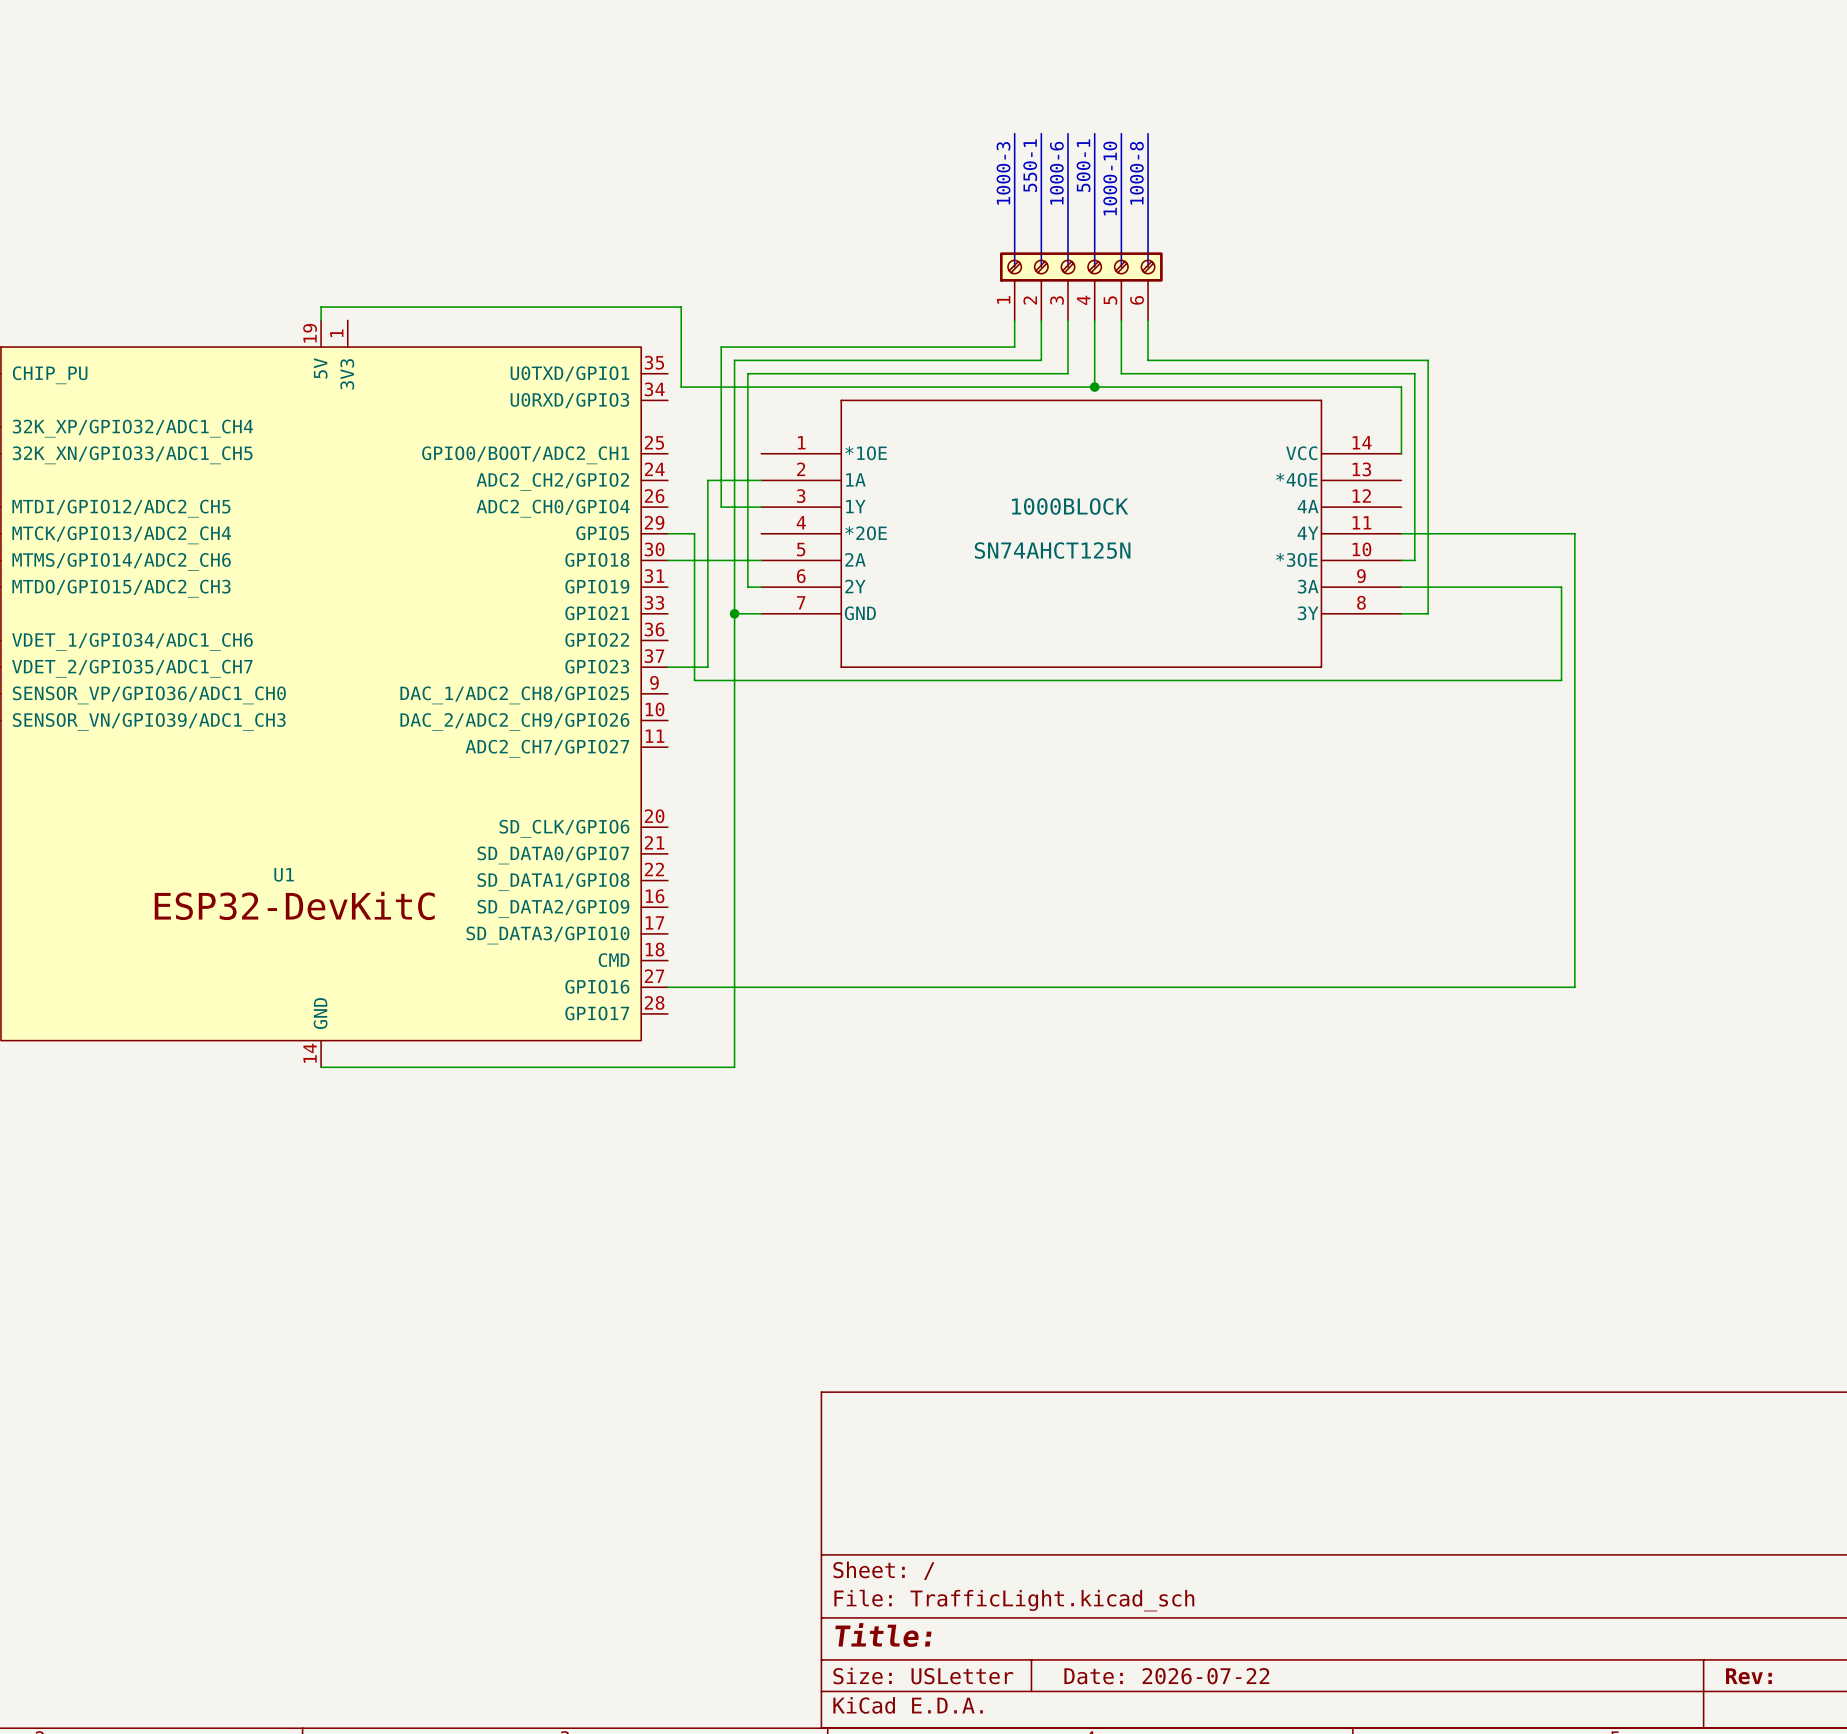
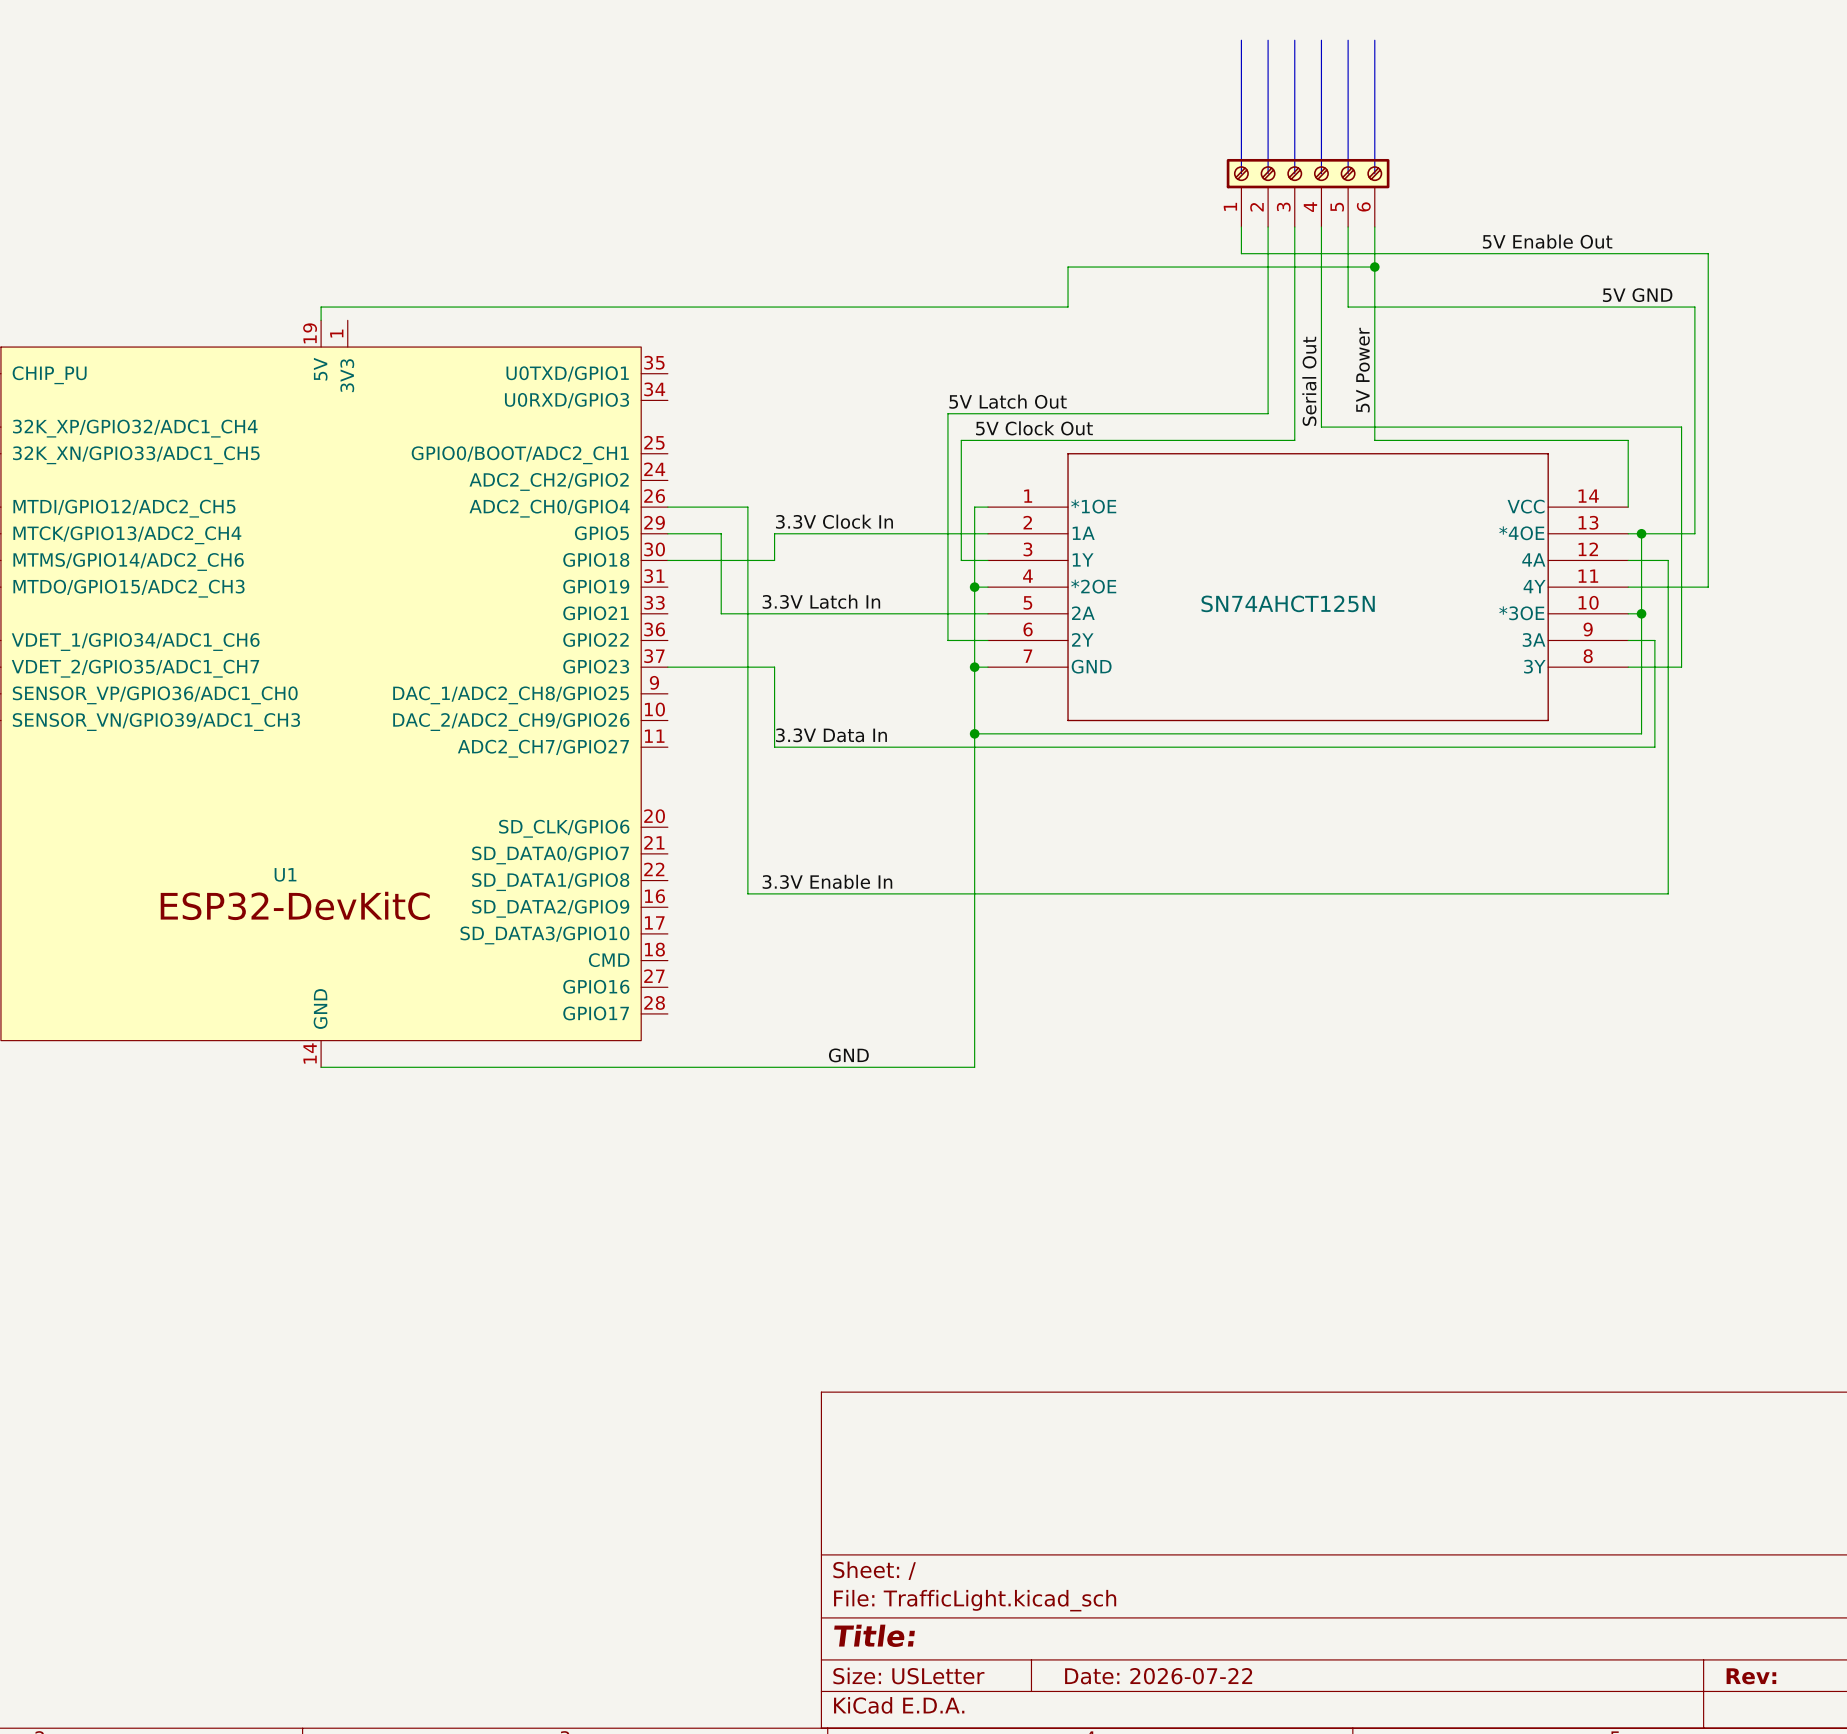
line: (1014, 133) (1014, 267) -> (1241, 40) (1241, 173)
line: (1041, 133) (1041, 267) -> (1268, 40) (1268, 173)
line: (1068, 133) (1068, 267) -> (1294, 40) (1294, 173)
line: (1094, 133) (1094, 267) -> (1321, 40) (1321, 173)
line: (1121, 133) (1121, 267) -> (1348, 40) (1348, 173)
line: (1148, 133) (1148, 267) -> (1374, 40) (1374, 173)
text: 550-1 (1030, 165) -> none
text: 500-1 (1083, 165) -> none
text: 1000-3 (1003, 173) -> none
text: 1000-6 (1056, 173) -> none
text: 1000-8 (1136, 173) -> none
text: 1000-10 (1110, 178) -> none
wire: none -> (1241, 227) (1241, 253) (1708, 253) (1708, 587) (1628, 587)
wire: none -> (1268, 227) (1268, 413) (947, 413) (947, 640) (987, 640)
wire: none -> (1294, 227) (1294, 440) (961, 440) (961, 560) (987, 560)
wire: none -> (1321, 227) (1321, 427) (1681, 427) (1681, 667) (1628, 667)
wire: none -> (1348, 227) (1348, 307) (1694, 307) (1694, 533) (1628, 533)
wire: none -> (1374, 227) (1374, 440) (1628, 440) (1628, 507)
label: none -> 5V Enable Out (1547, 241)
junction: none -> (1374, 267)
part position: (1081, 286) -> (1308, 192)
label: none -> 5V GND (1637, 295)
wire: (681, 307) (681, 387) (1401, 387) (1401, 453) -> (681, 307) (1068, 307) (1068, 267) (1374, 267)
wire: (1014, 320) (1014, 347) (721, 347) (721, 507) -> (667, 507) (721, 507)
wire: (1041, 320) (1041, 360) (734, 360) (734, 1067) -> (987, 507) (974, 507) (974, 1067) (734, 1067)
wire: (1068, 320) (1068, 373) (747, 373) (747, 507) (761, 507) -> none
wire: (1094, 320) (1094, 387) -> none
wire: (1121, 320) (1121, 373) (1414, 373) (1414, 560) (1401, 560) -> none
wire: (1148, 320) (1148, 360) (1428, 360) (1428, 613) (1401, 613) -> none
label: none -> 5V Power (1363, 370)
label: none -> Serial Out (1309, 381)
junction: (1094, 387) -> none
label: none -> 5V Latch Out (1008, 401)
label: none -> 5V Clock Out (1034, 428)
wire: (761, 480) (707, 480) (707, 667) -> (1628, 640) (1654, 640) (1654, 747) (774, 747) (774, 667) (707, 667)
label: none -> 3.3V Clock In (834, 521)
wire: (694, 533) (694, 680) (1561, 680) (1561, 587) (1401, 587) -> (694, 533) (721, 533) (721, 613) (734, 613)
wire: none -> (987, 533) (774, 533) (774, 560) (761, 560)
1000BLOCK: SN74AHCT125N (1081, 533) -> none
wire: (1401, 533) (1574, 533) (1574, 987) (667, 987) -> none
wire: none -> (1641, 533) (1641, 733) (974, 733)
junction: none -> (1641, 533)
wire: (747, 587) (761, 587) -> (747, 587) (747, 893) (1668, 893) (1668, 560) (1628, 560)
wire: none -> (974, 587) (987, 587)
junction: none -> (974, 587)
part: none -> SN74AHCT125N (1308, 587)
label: none -> 3.3V Latch In (821, 601)
junction: (734, 613) -> none
wire: none -> (761, 613) (987, 613)
wire: none -> (1628, 613) (1641, 613)
junction: none -> (1641, 613)
junction: none -> (974, 667)
junction: none -> (974, 733)
label: none -> 3.3V Data In (831, 735)
label: none -> 3.3V Enable In (827, 881)
label: none -> GND (848, 1055)

